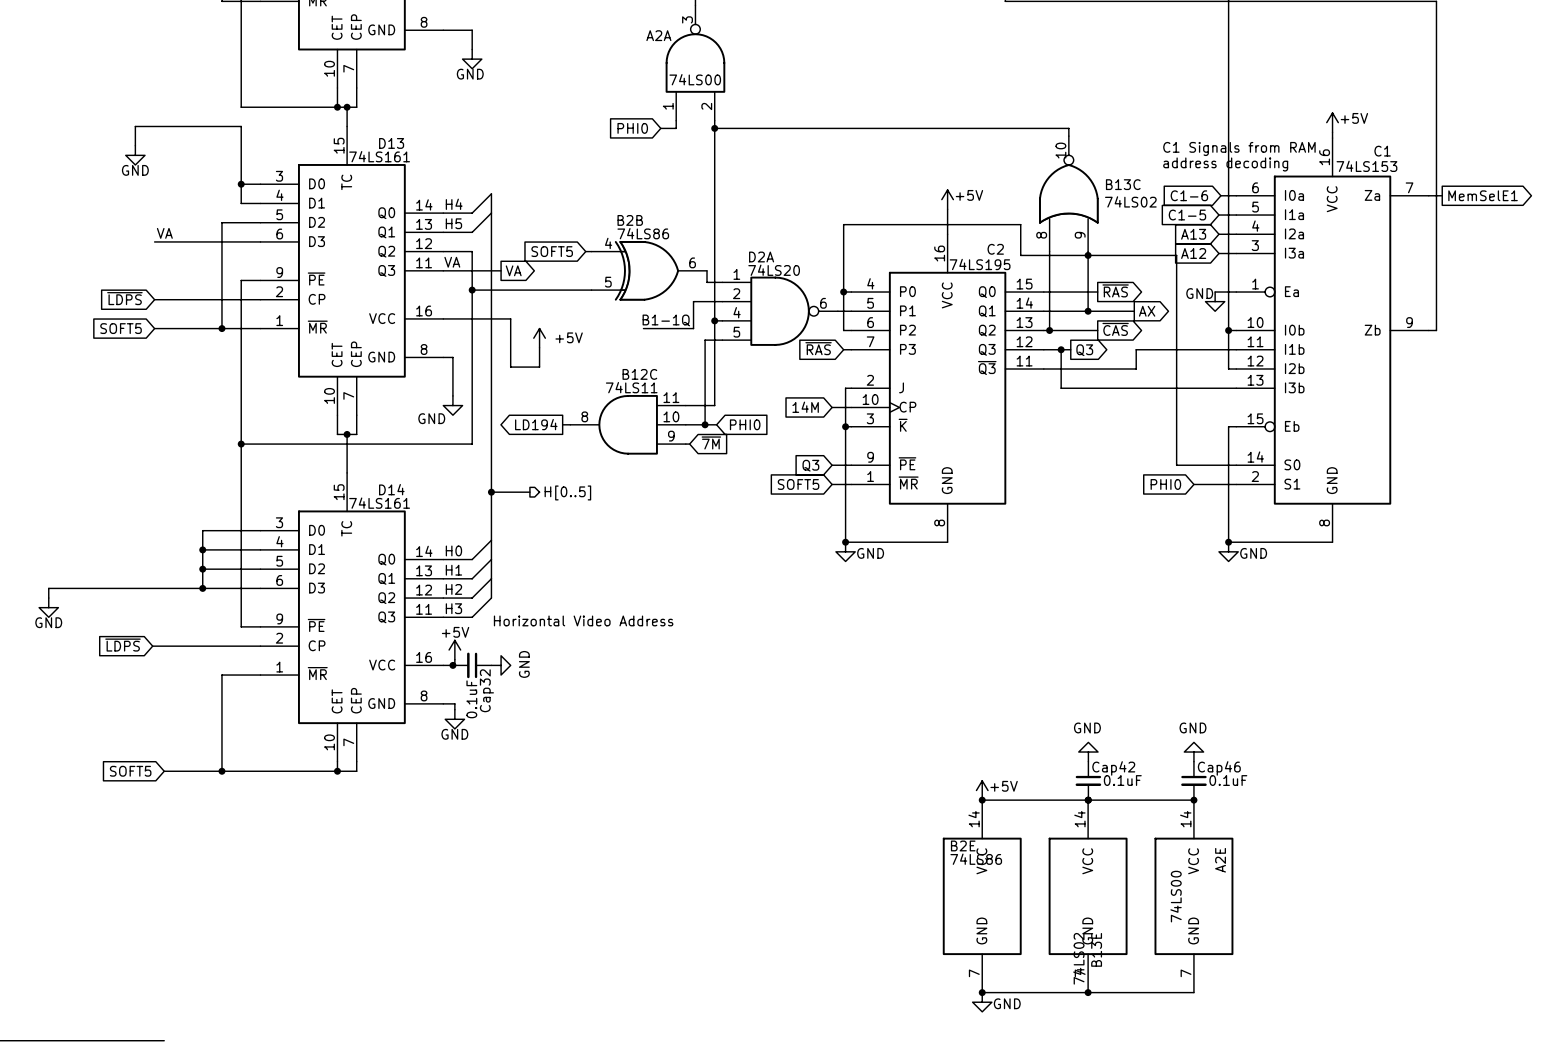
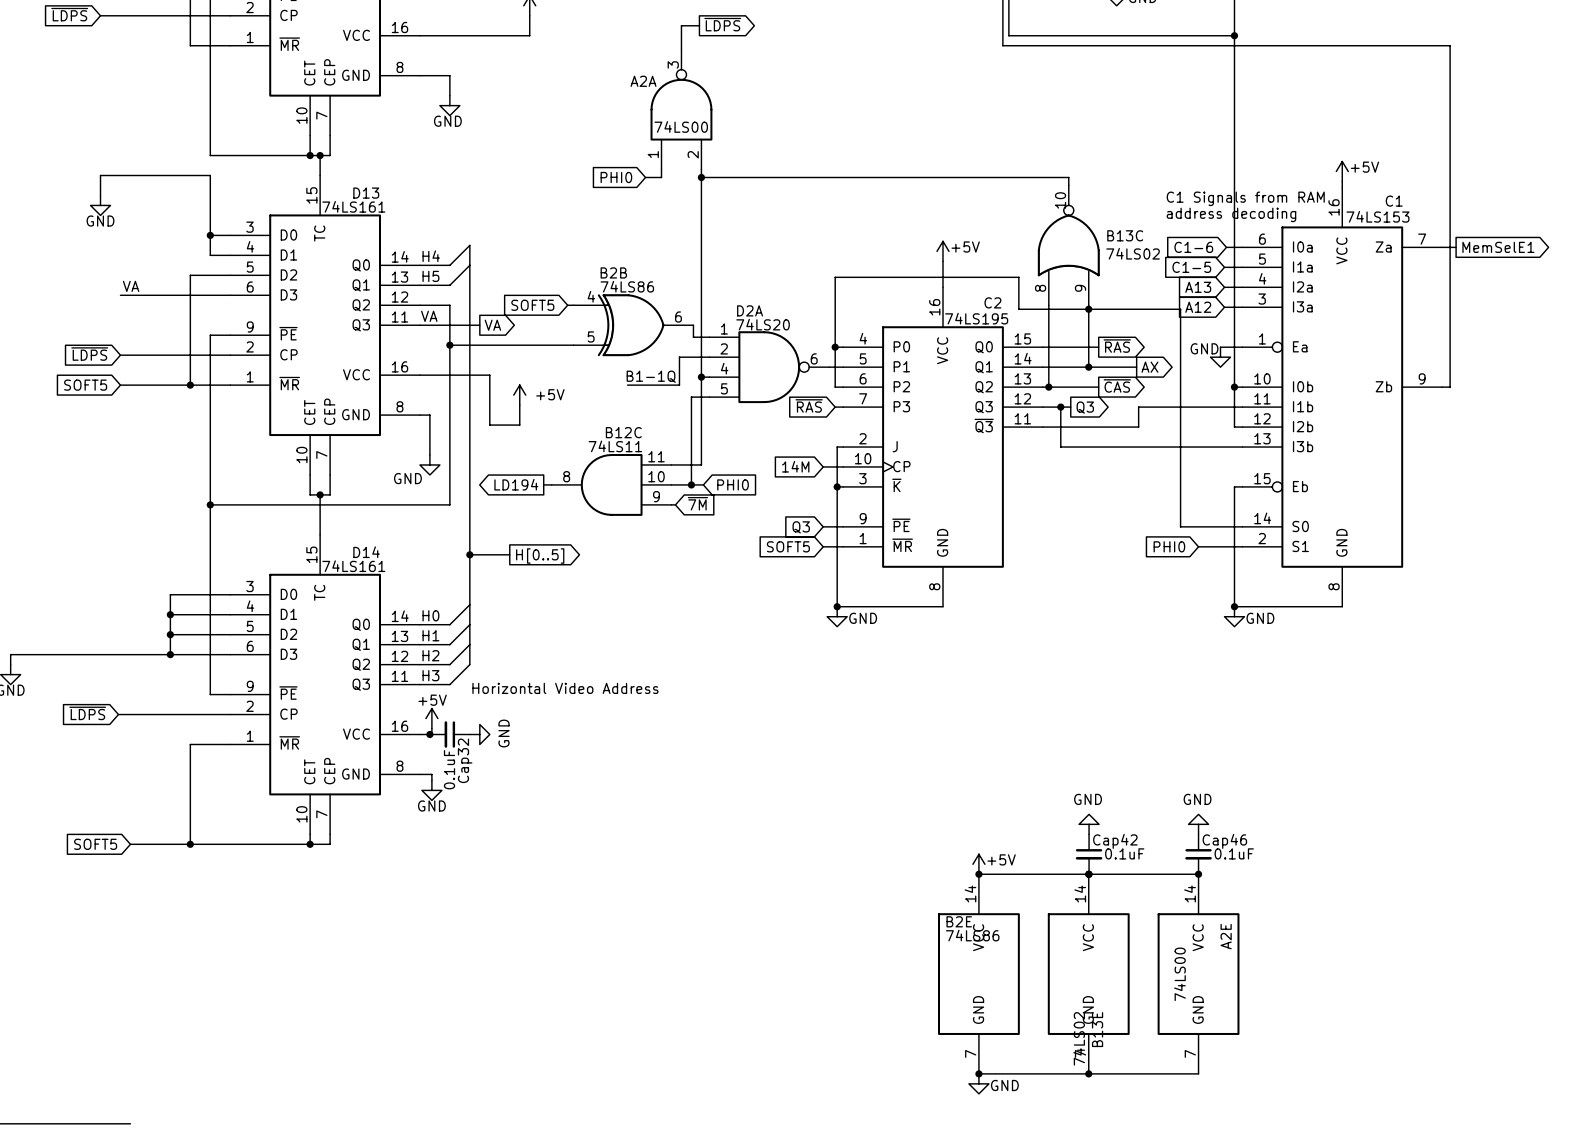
hierarchical label: H[0..5] (567, 492) -> none
global label: none -> H[0..5] (540, 556)

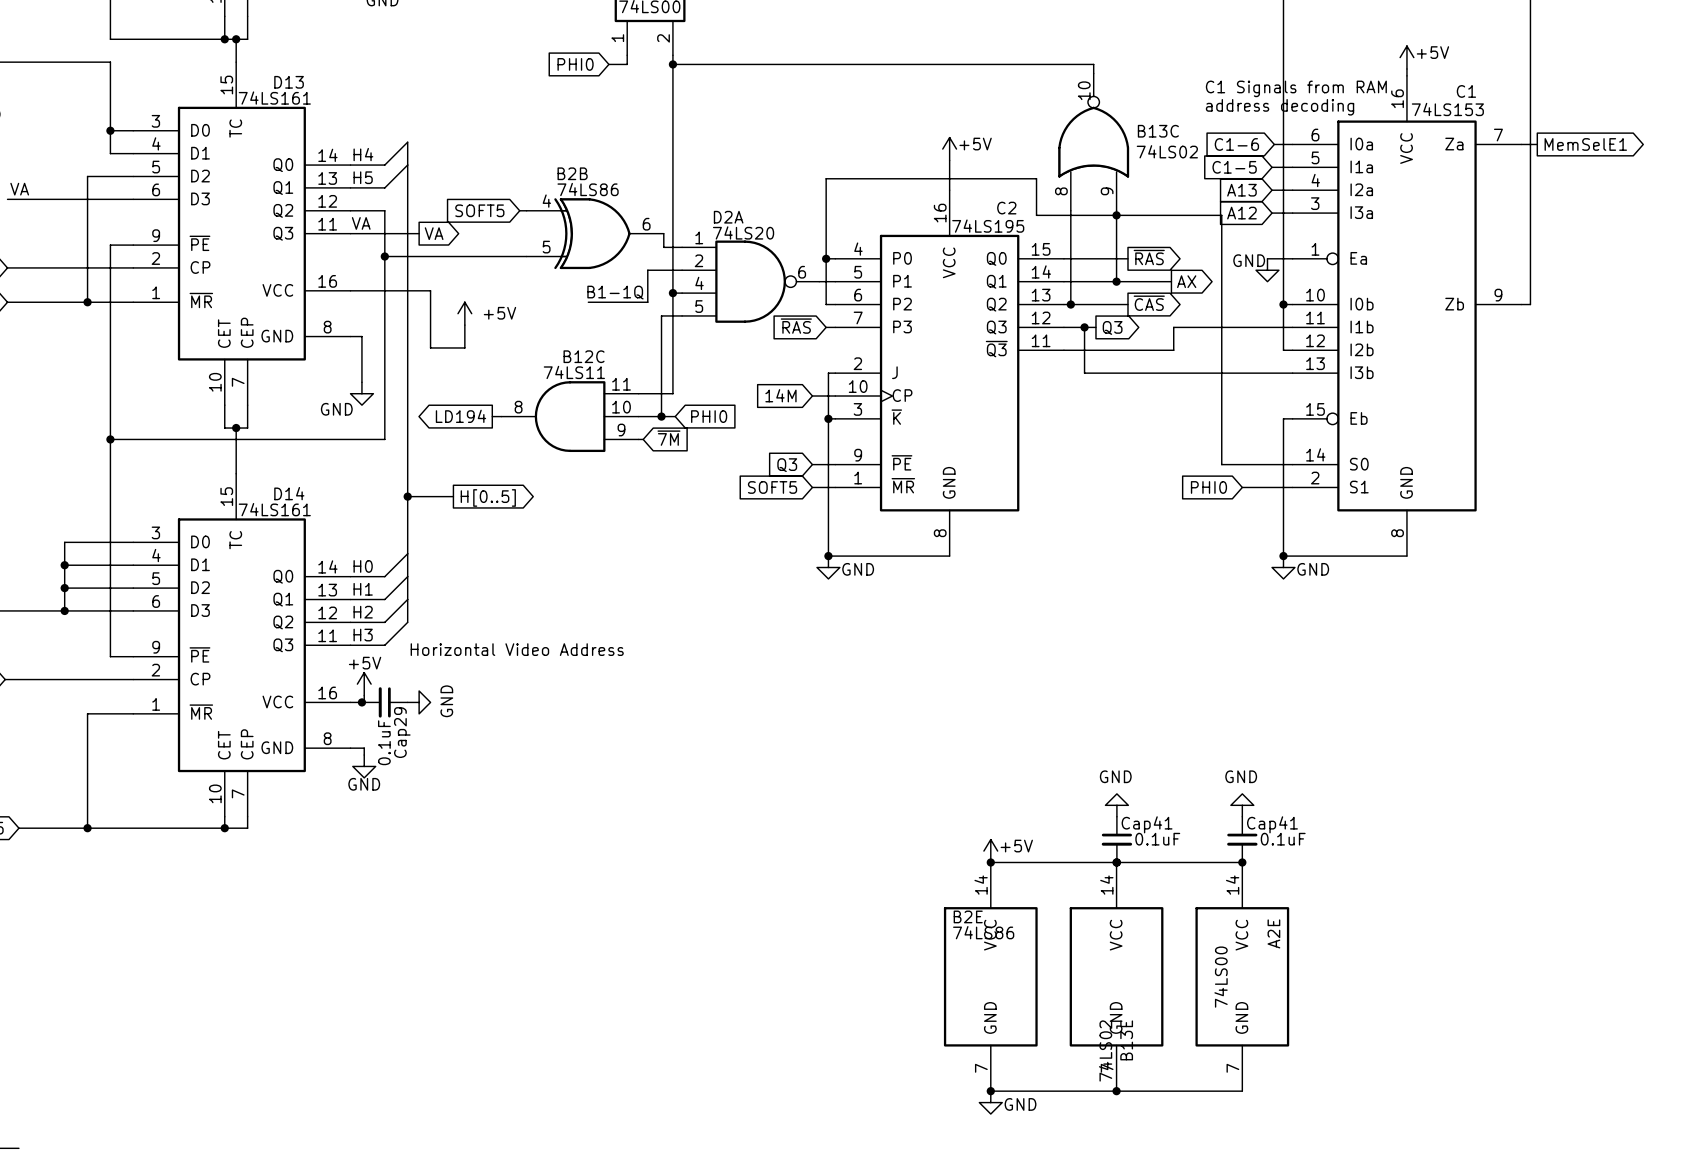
Cap32 name: Cap32 (465, 760) -> Cap29 (402, 732)
Cap42 name: Cap42 (1115, 841) -> Cap41 (1147, 824)
Cap46 name: Cap46 (1224, 841) -> Cap41 (1272, 824)

